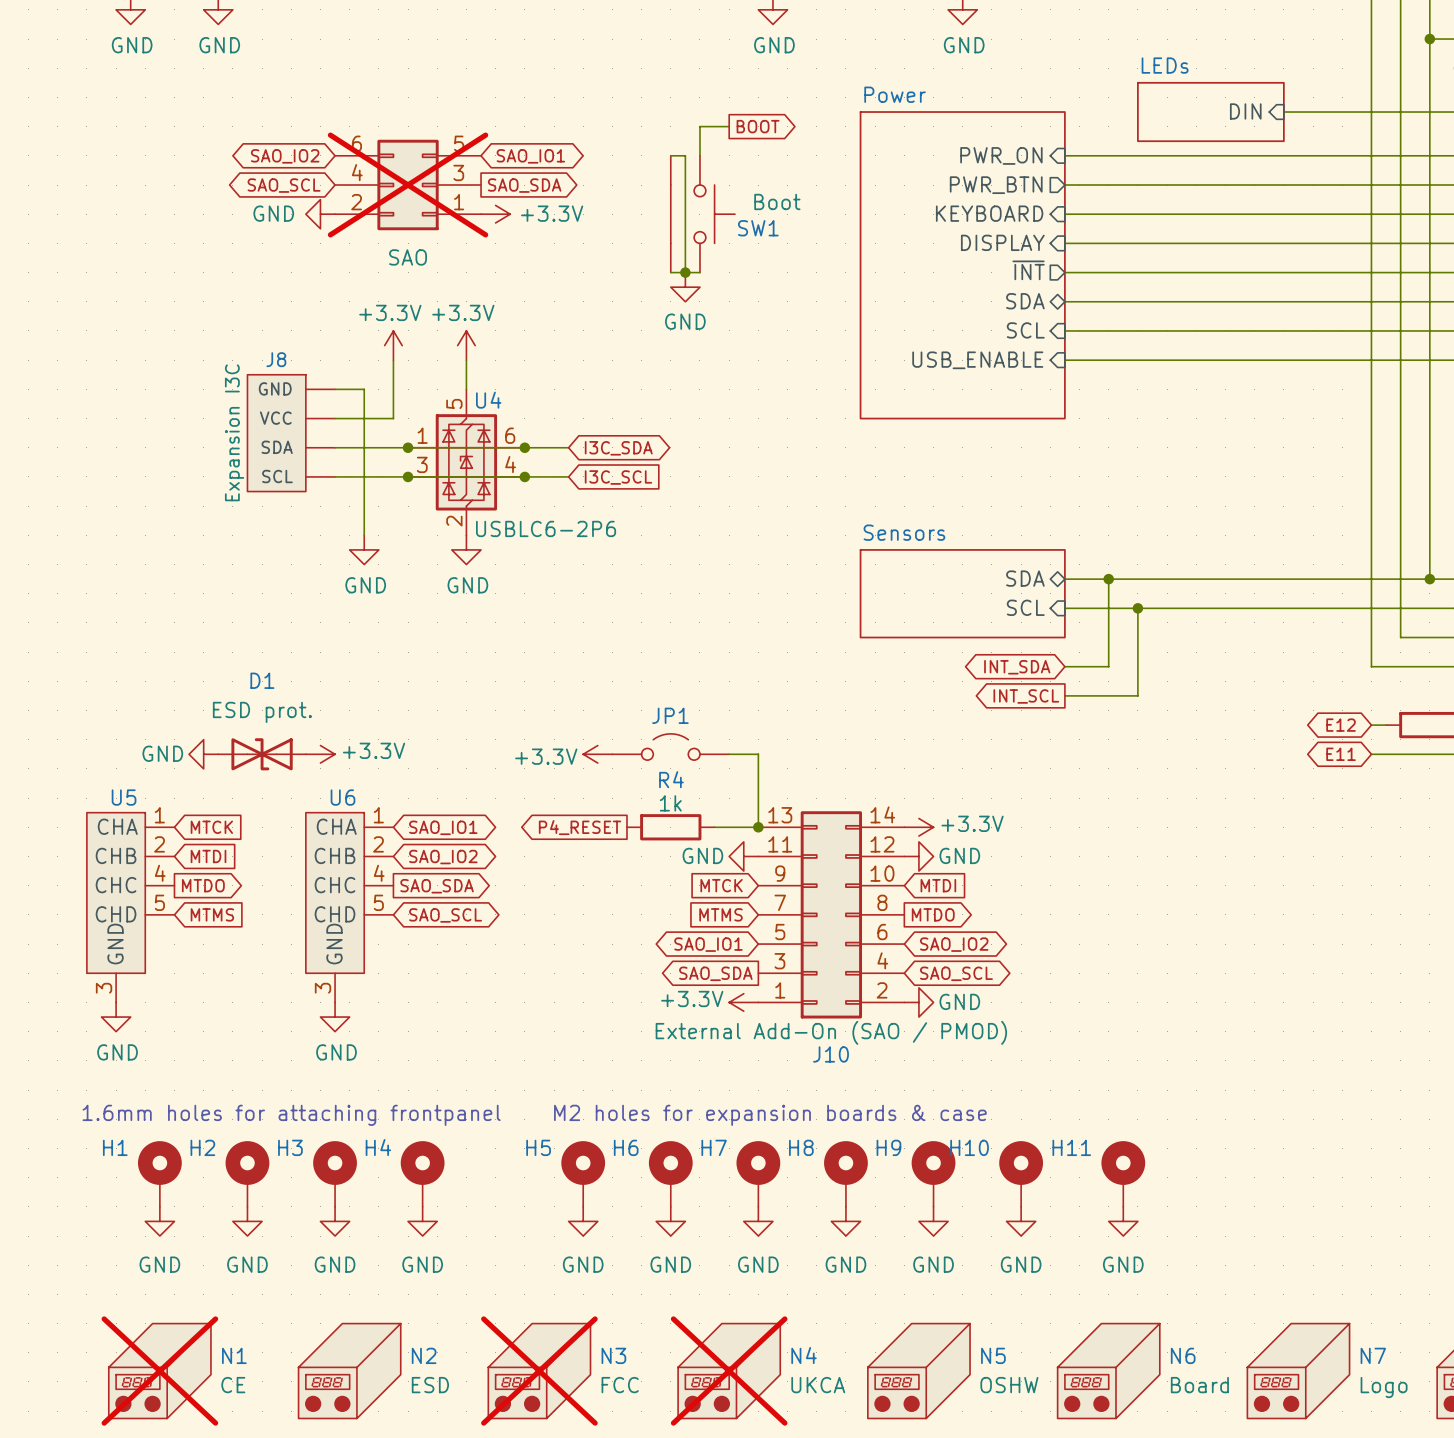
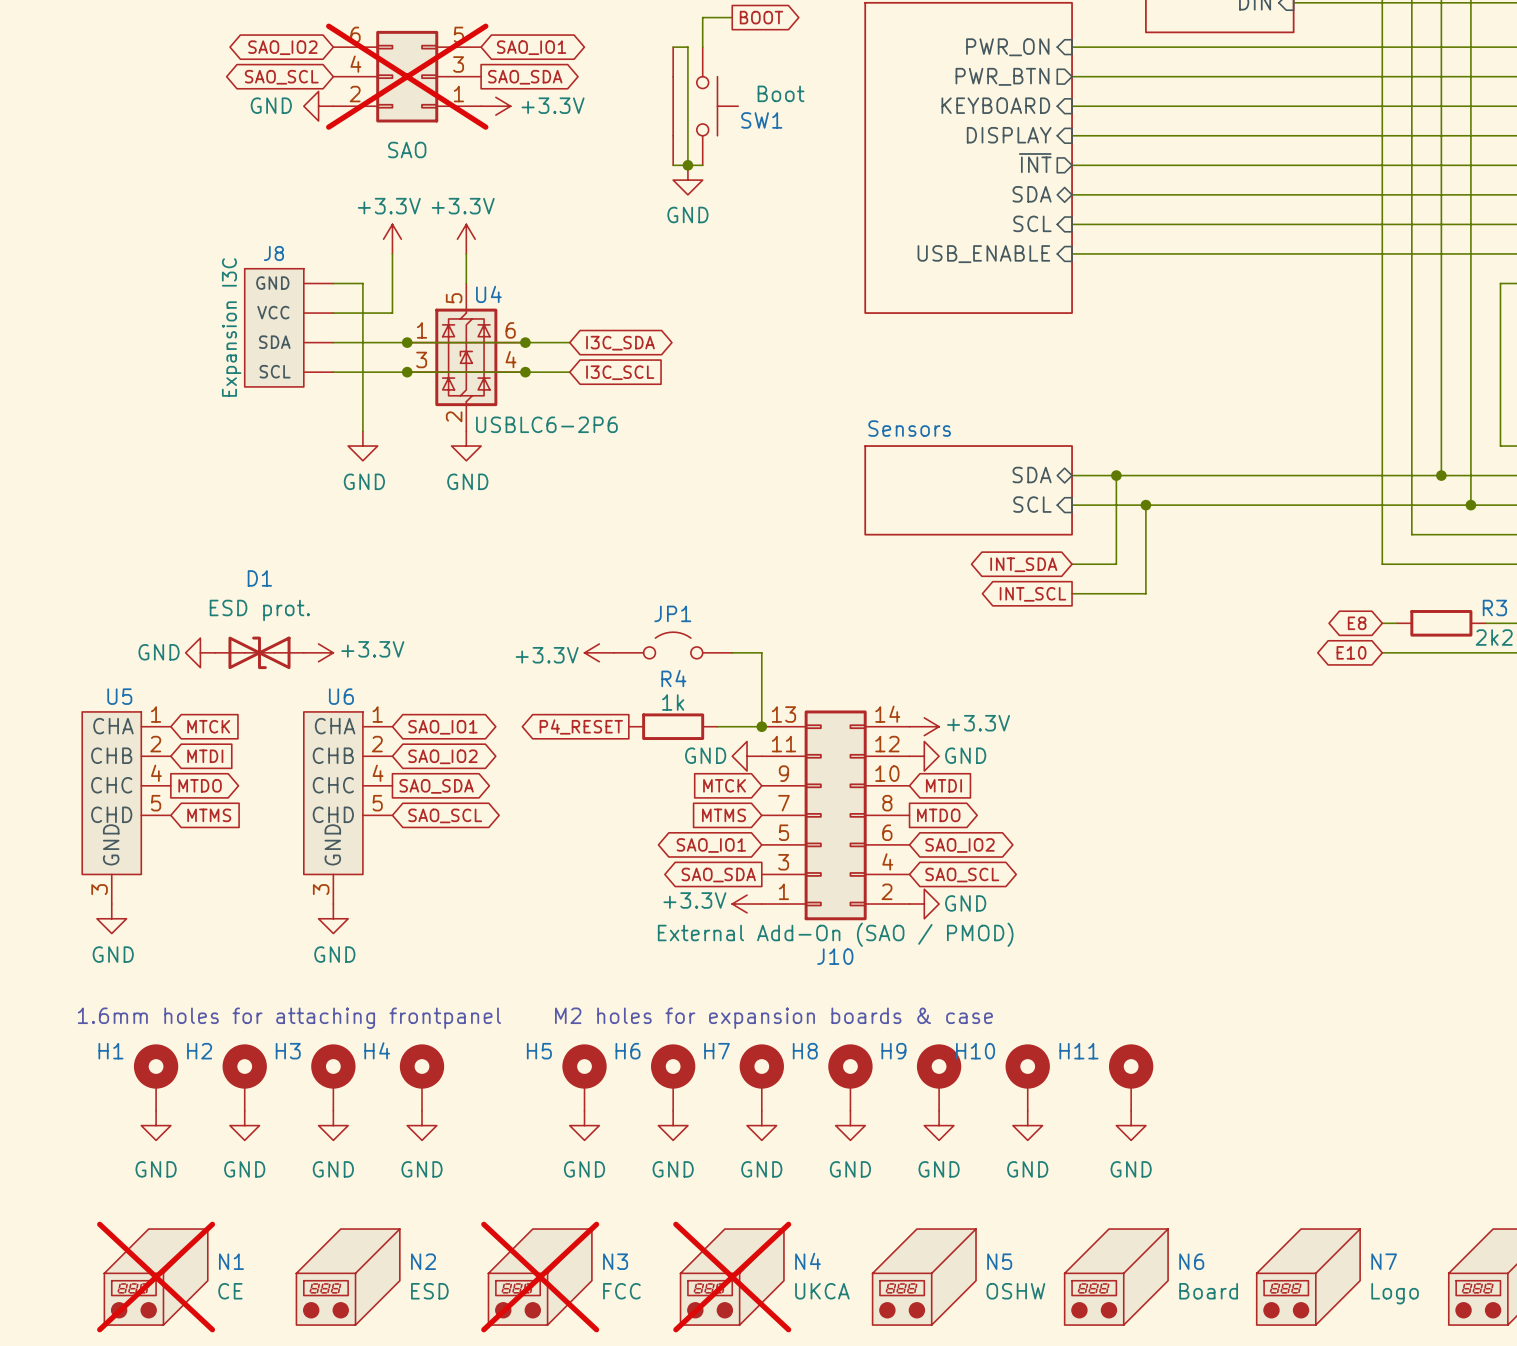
global label: E12 (1341, 725) -> E8 (1357, 623)
global label: E11 (1341, 754) -> E10 (1351, 652)

